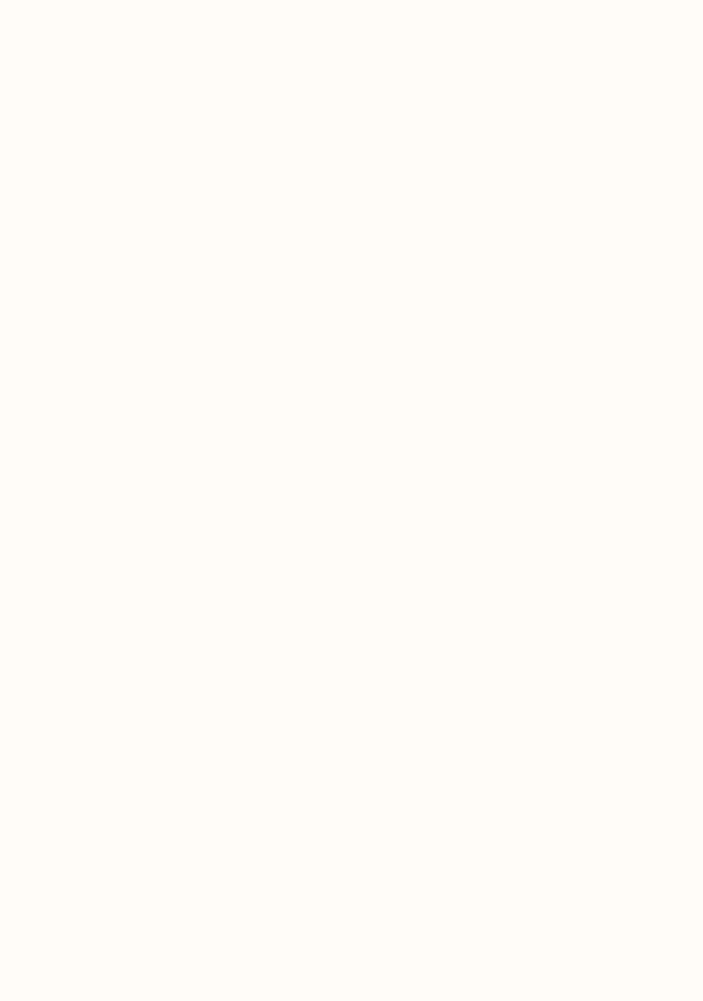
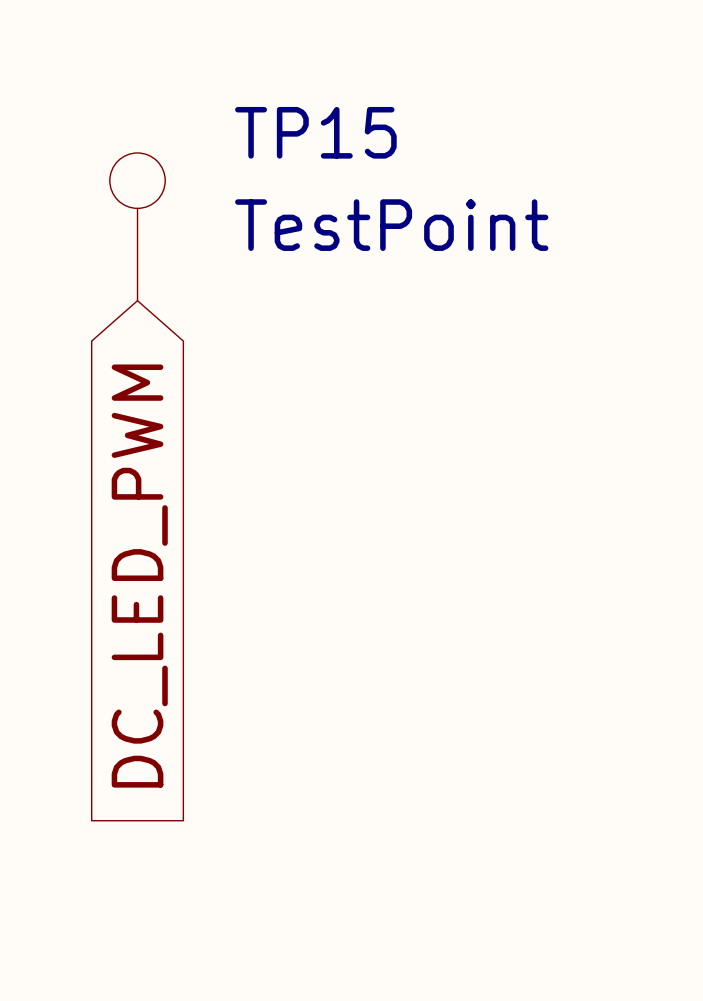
TP15: none -> TestPoint (137, 226)
global label: none -> DC_LED_PWM (139, 576)

